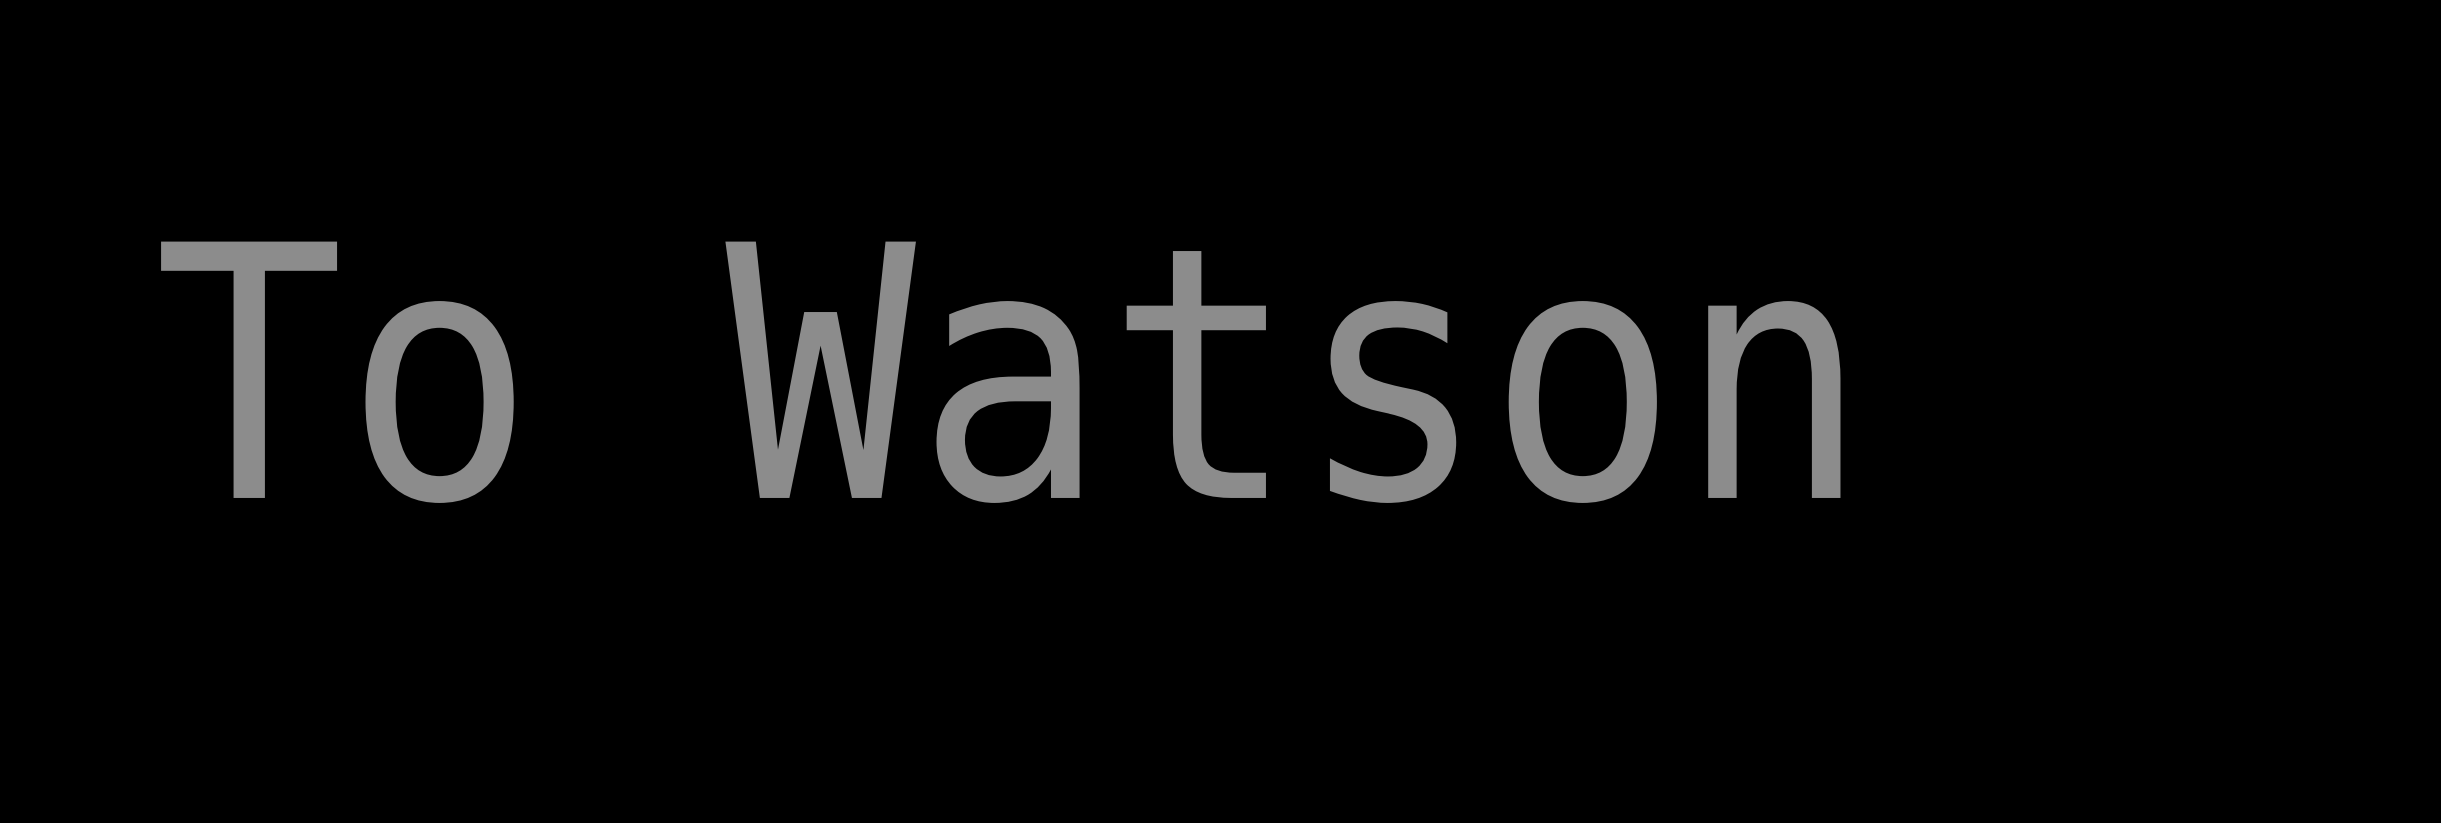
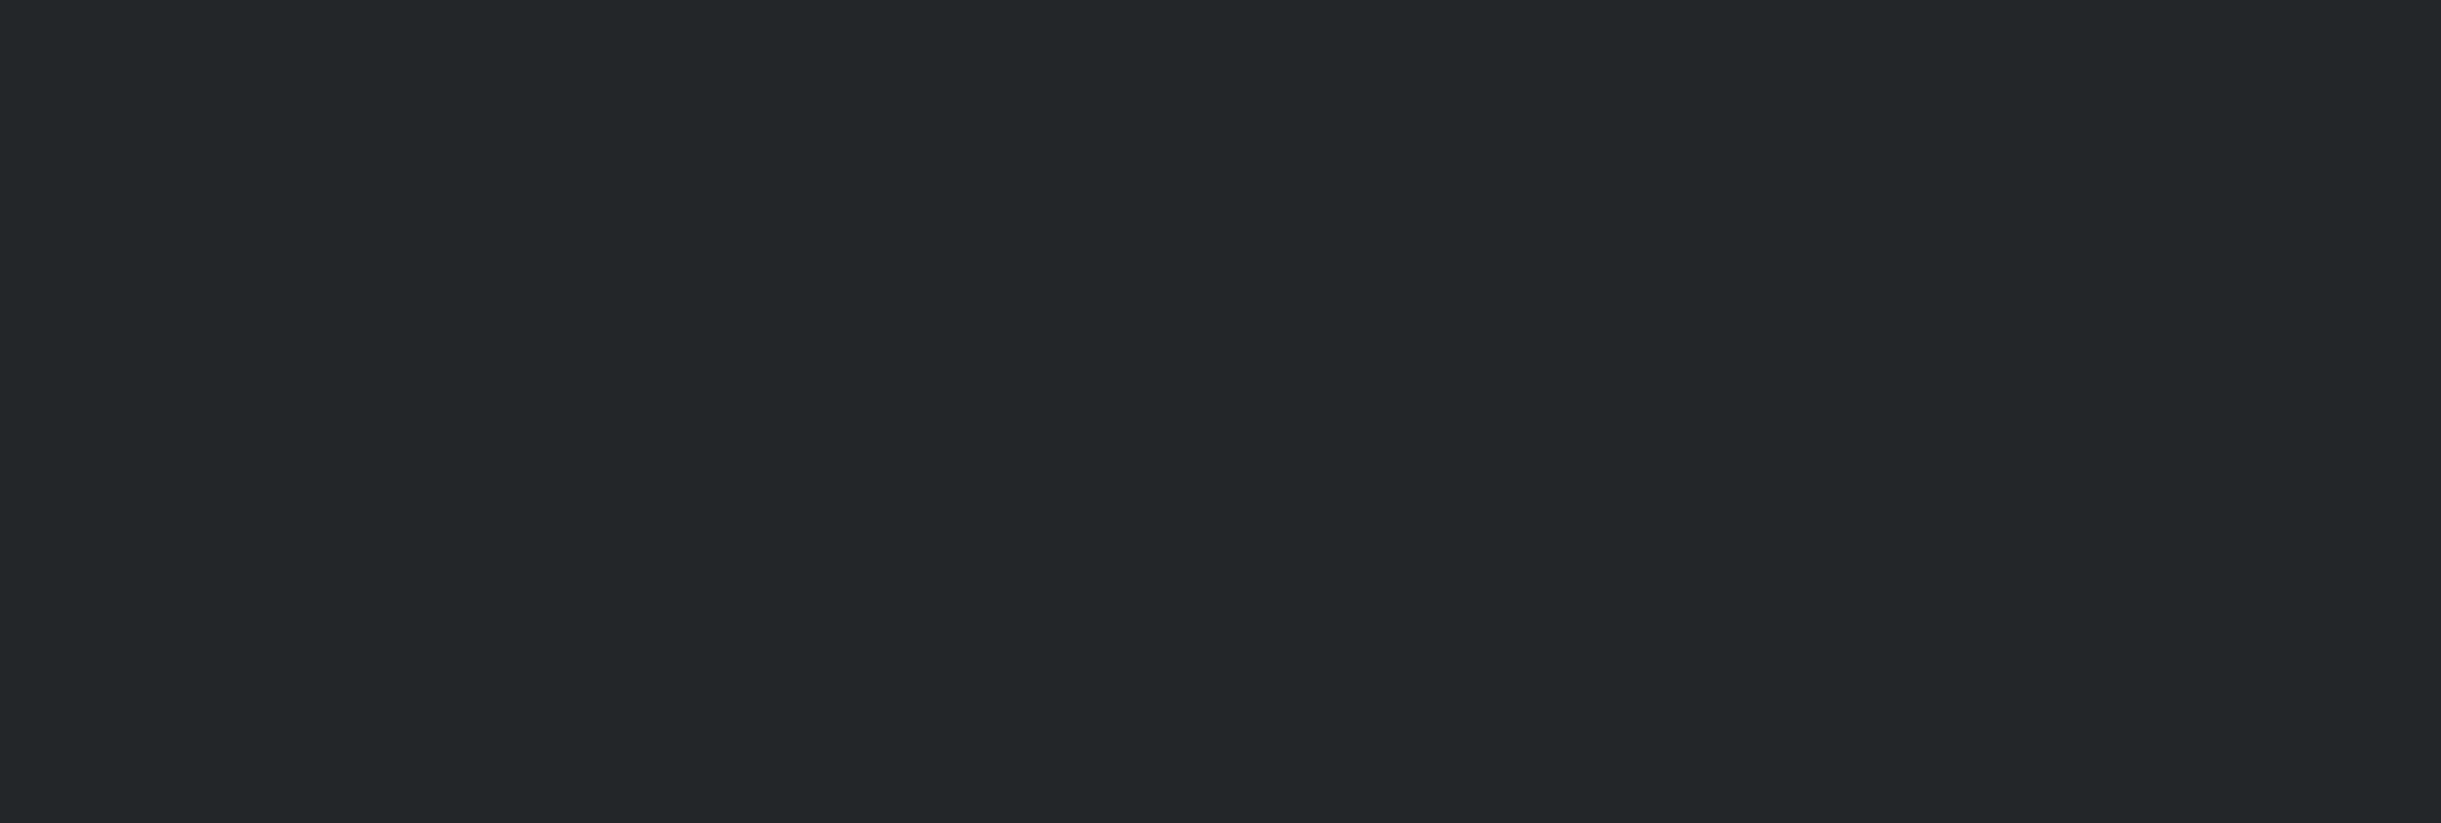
text: To Watson (1000, 372) -> none

